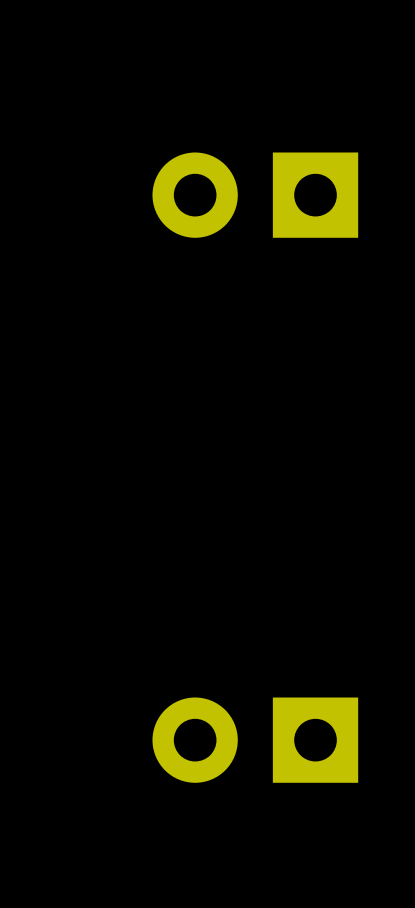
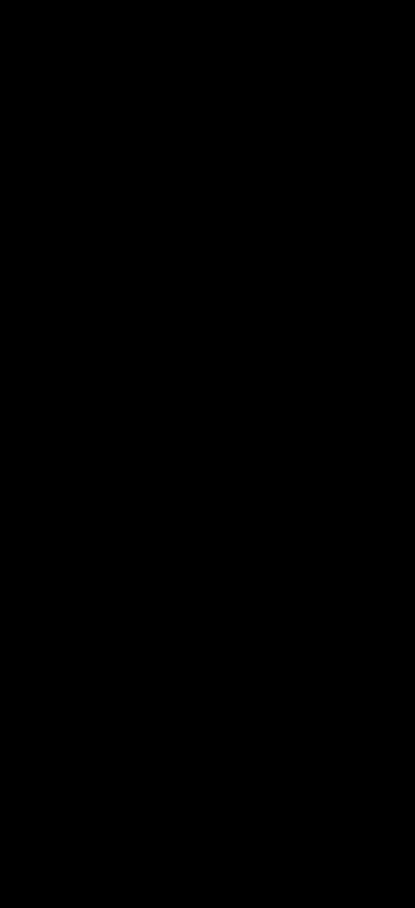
part: (255, 195) -> none
part: (255, 740) -> none

